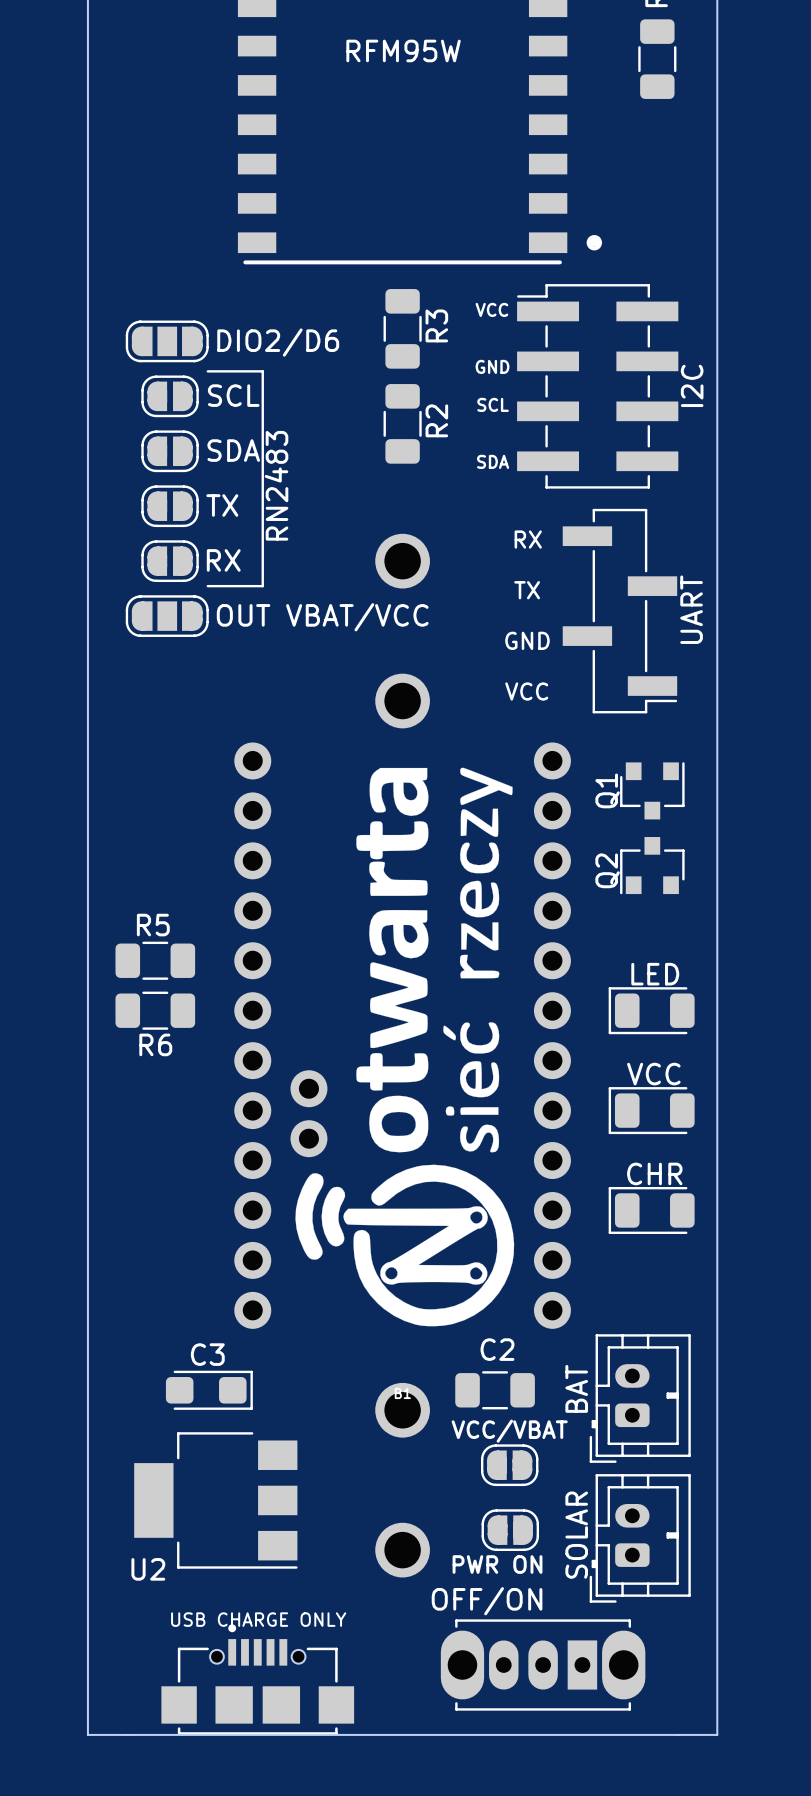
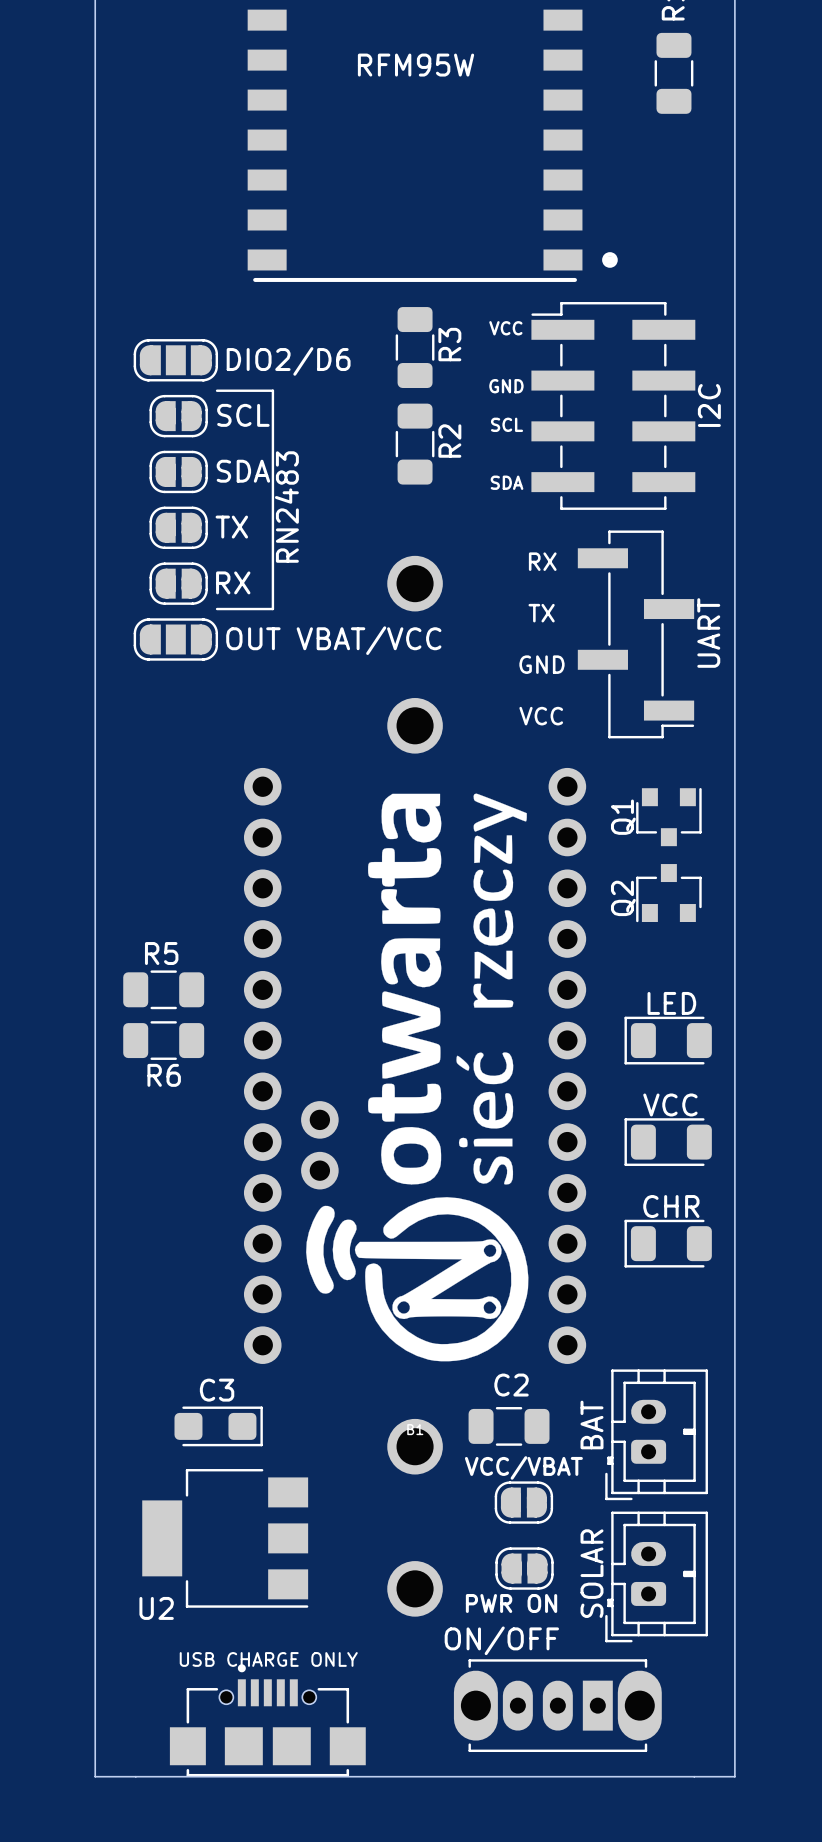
OFF/ON name: OFF/ON (487, 1601) -> ON/OFF (501, 1640)

